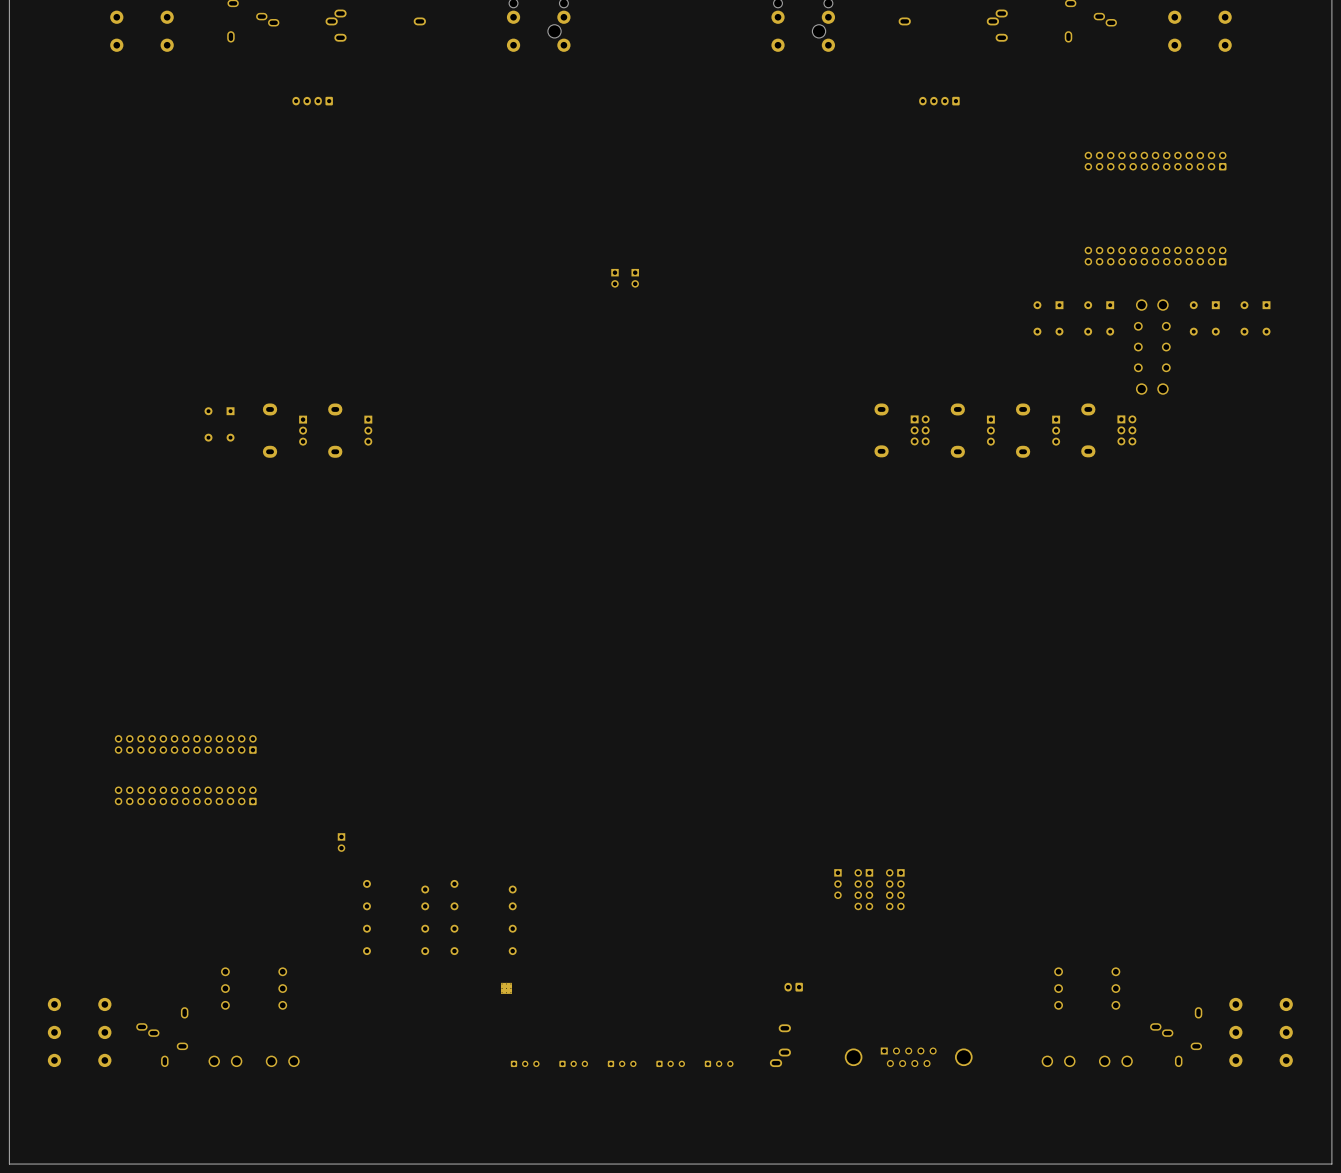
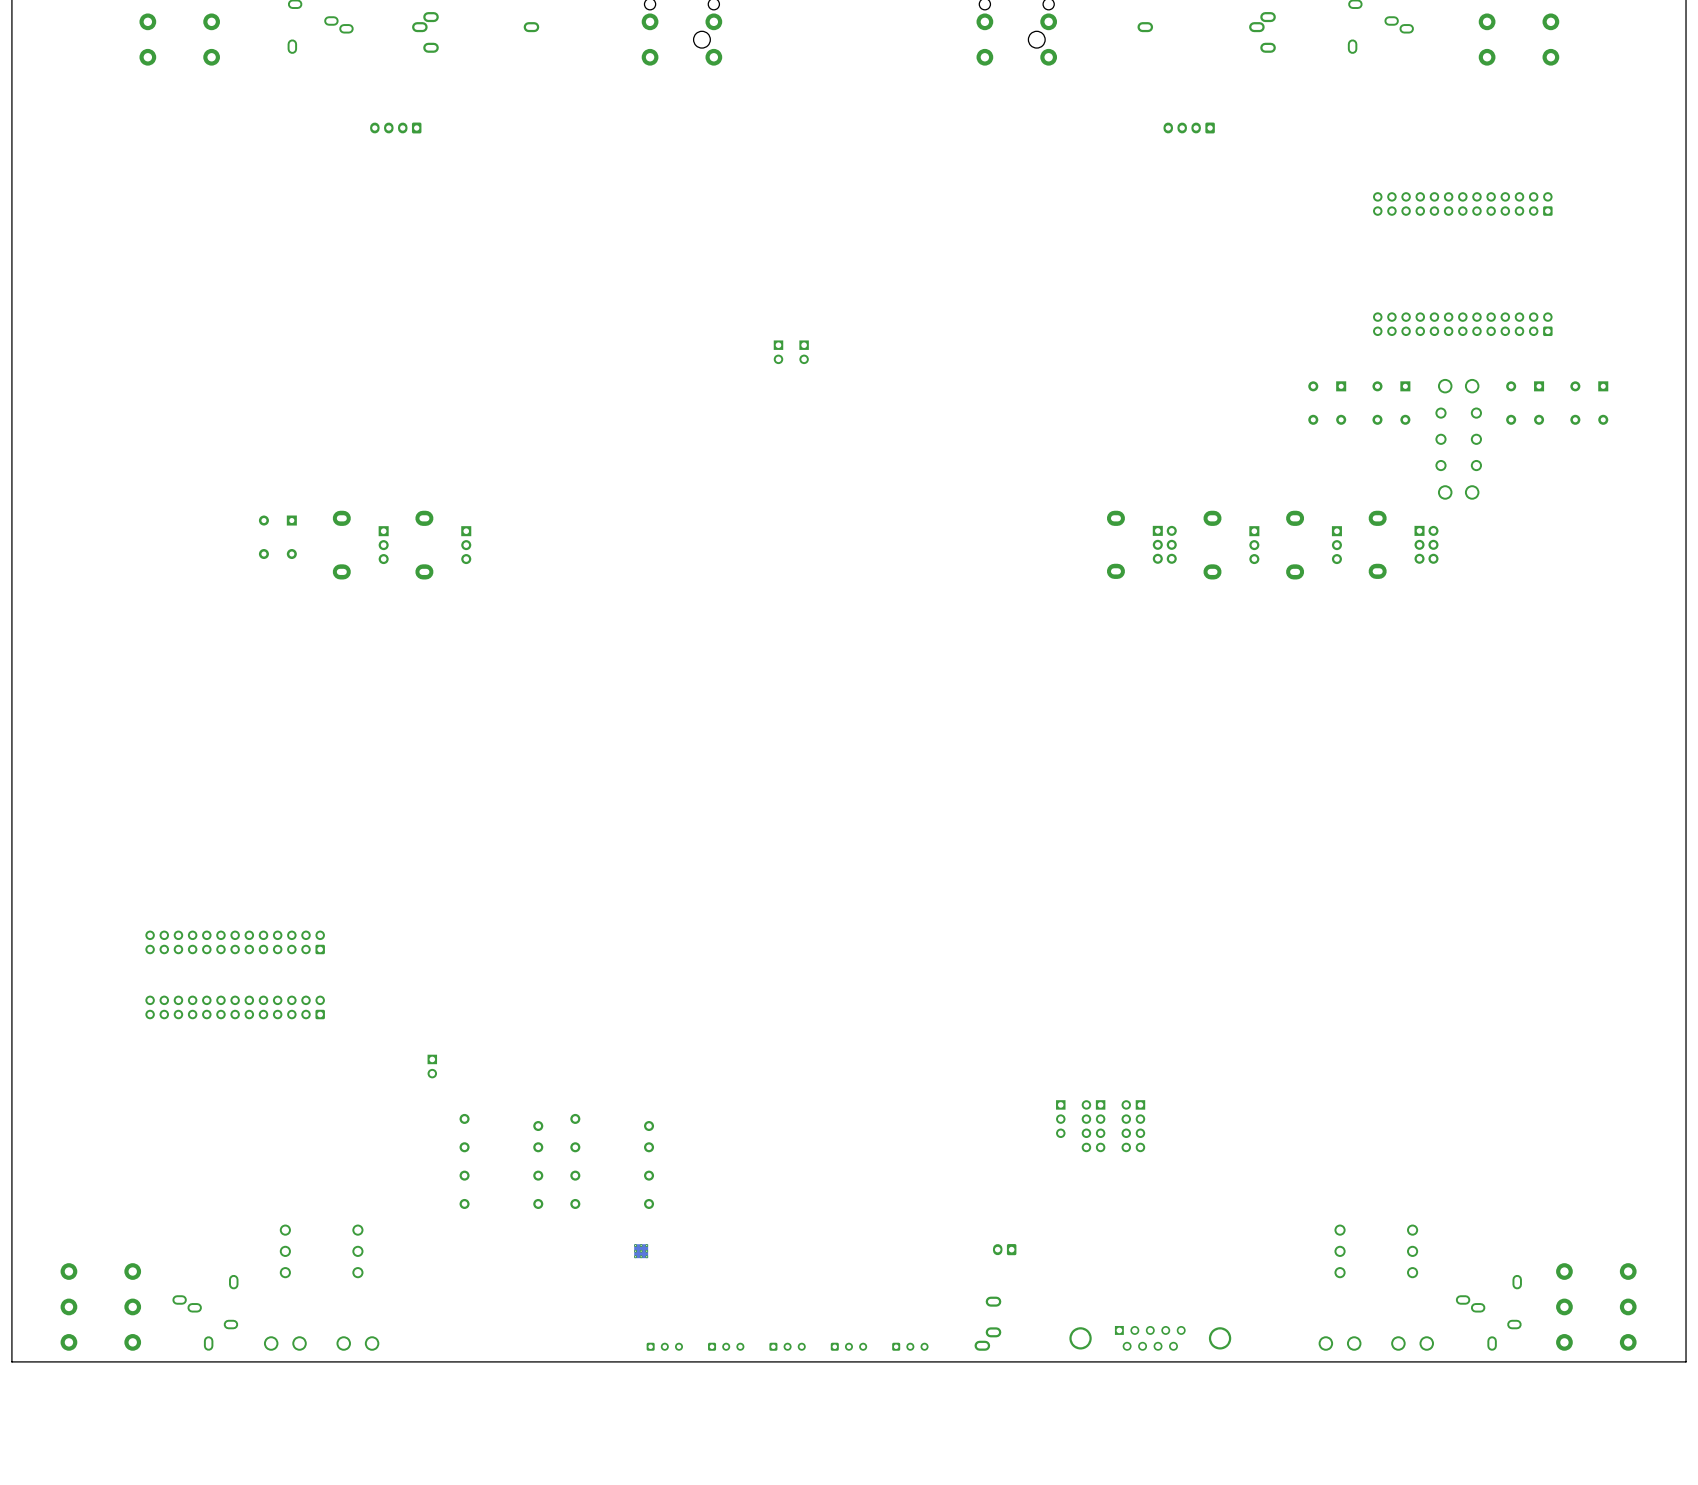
board edge: (1331, 1075) (1331, 1164) (9, 1164) (9, 1075) -> (1686, 1361) (11, 1361)

